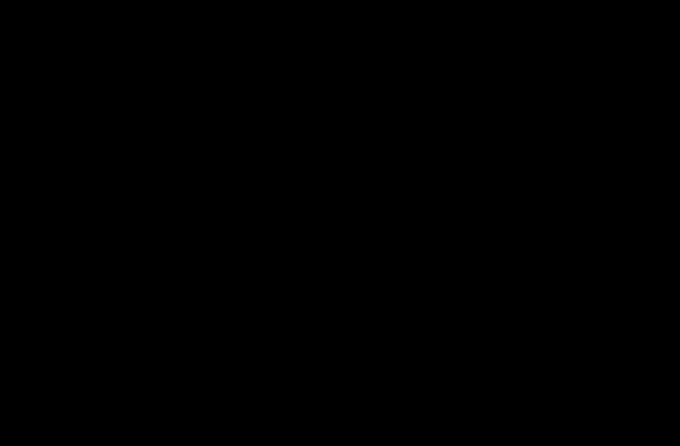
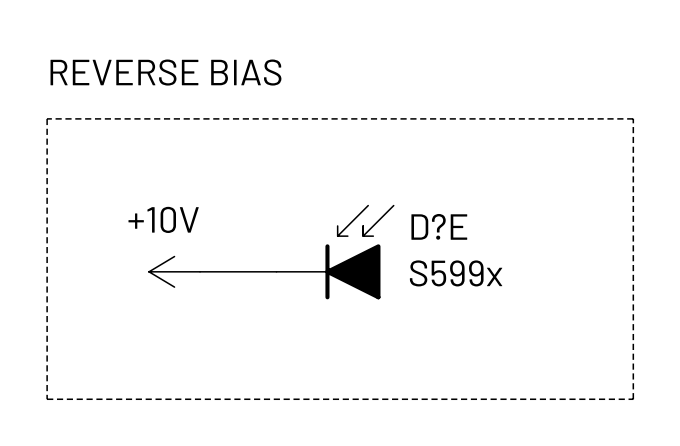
text: none -> REVERSE BIAS (165, 72)
line: none -> (47, 118) (47, 399) (633, 399) (633, 118) (47, 118)
D?E: none -> S599x (335, 252)
power symbol: none -> +10V (174, 271)
wire: none -> (200, 271) (276, 271)

